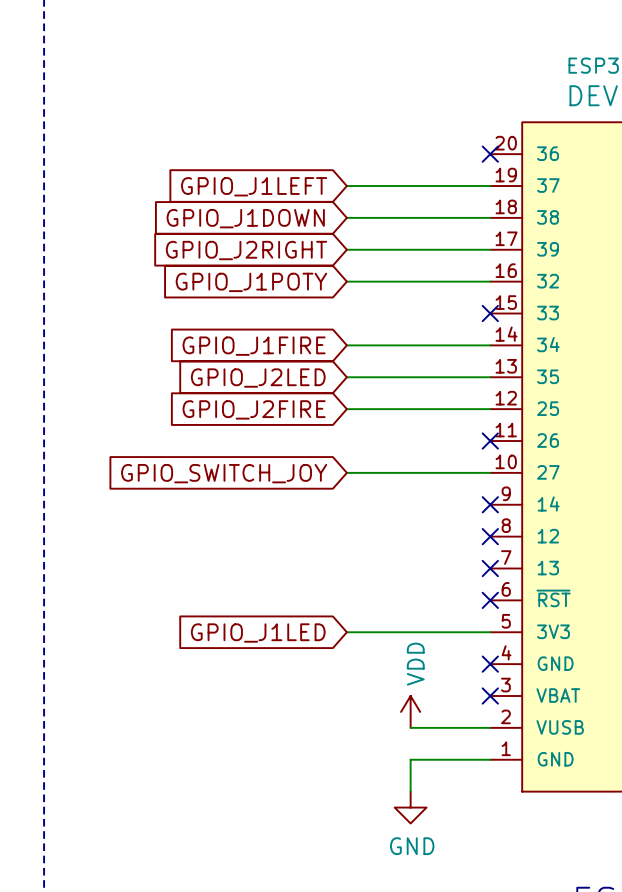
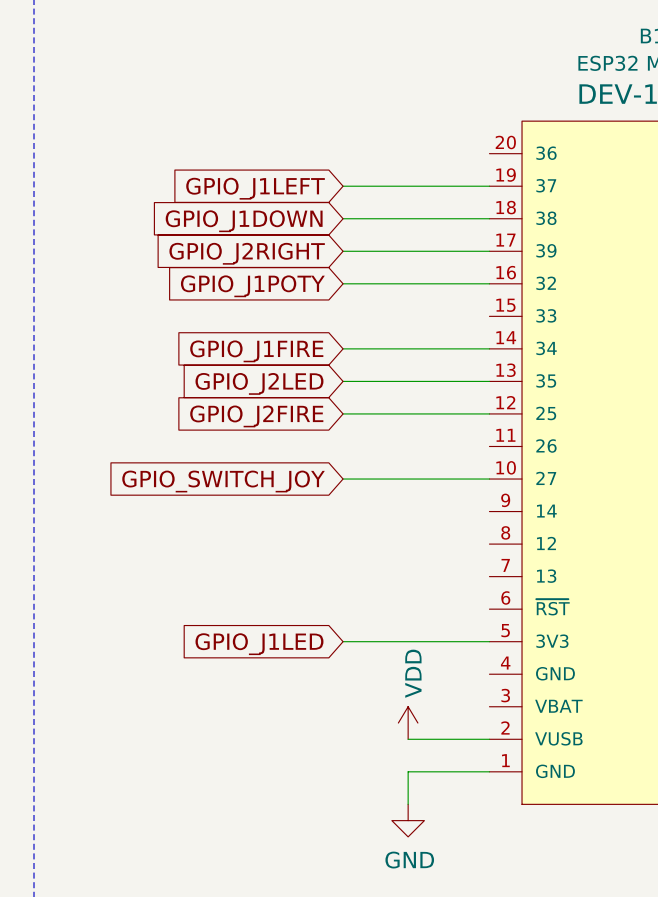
no-connect mark: (490, 154) -> none
no-connect mark: (490, 313) -> none
no-connect mark: (490, 441) -> none
no-connect mark: (490, 504) -> none
no-connect mark: (490, 536) -> none
no-connect mark: (490, 568) -> none
no-connect mark: (490, 600) -> none
no-connect mark: (490, 664) -> none
no-connect mark: (490, 696) -> none

